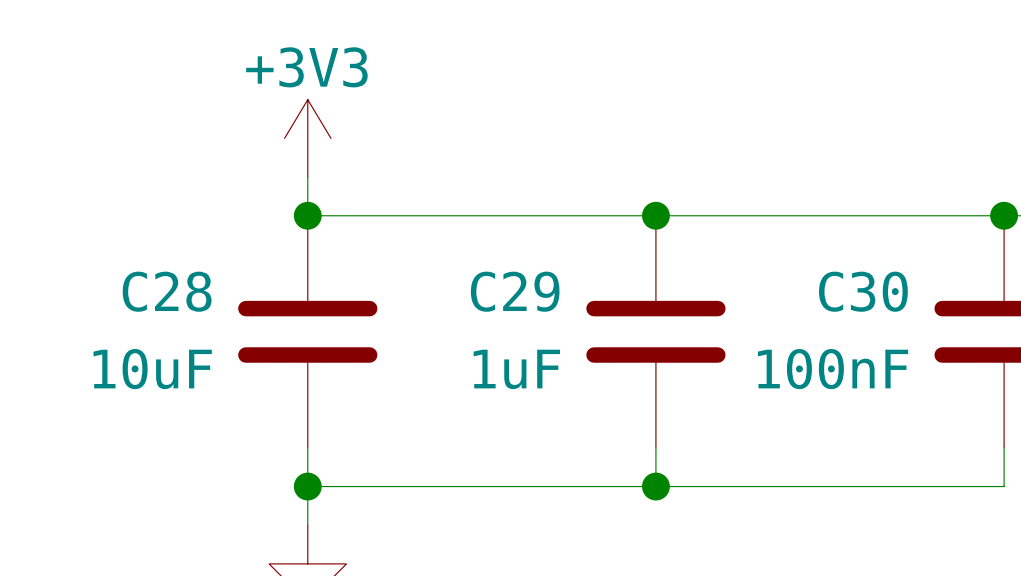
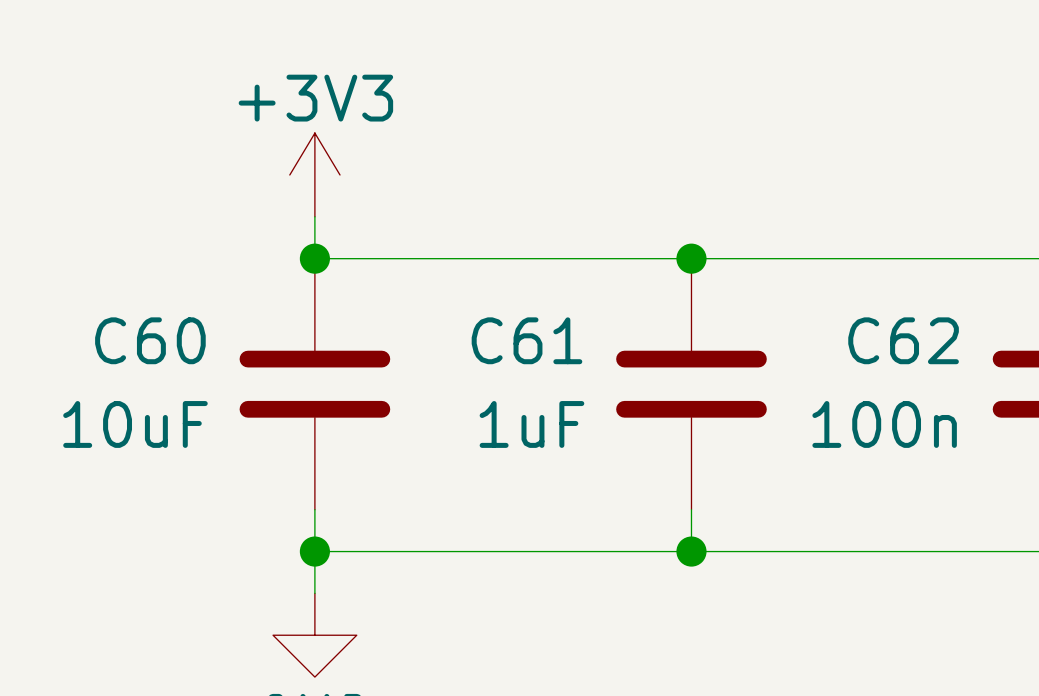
C28 name: C28 (167, 291) -> C60 (150, 340)
C29 name: C29 (515, 291) -> C61 (526, 340)
C30 name: C30 (863, 291) -> C62 (903, 340)
C30 value: 100nF (833, 369) -> 100n (884, 424)

